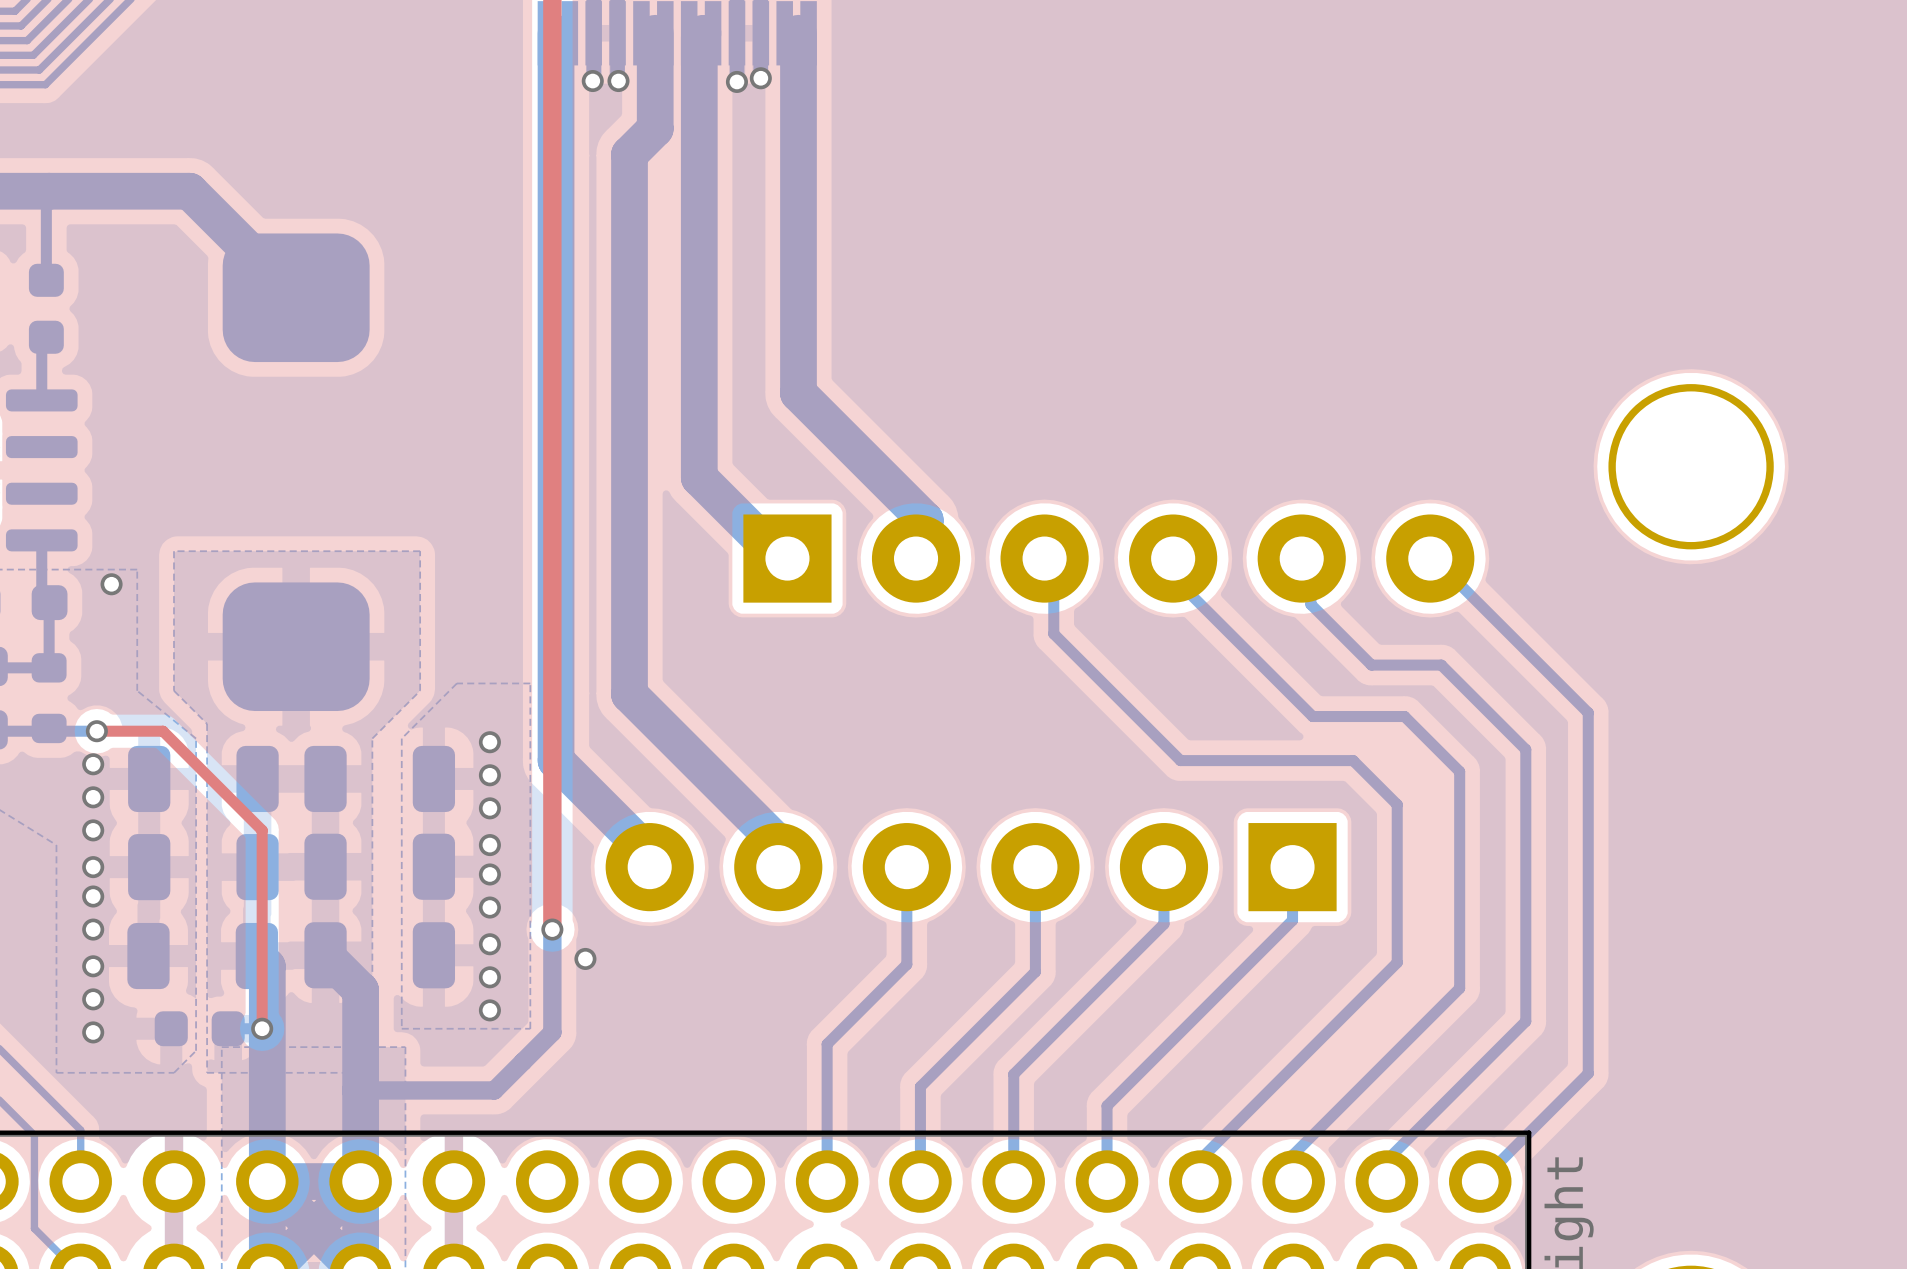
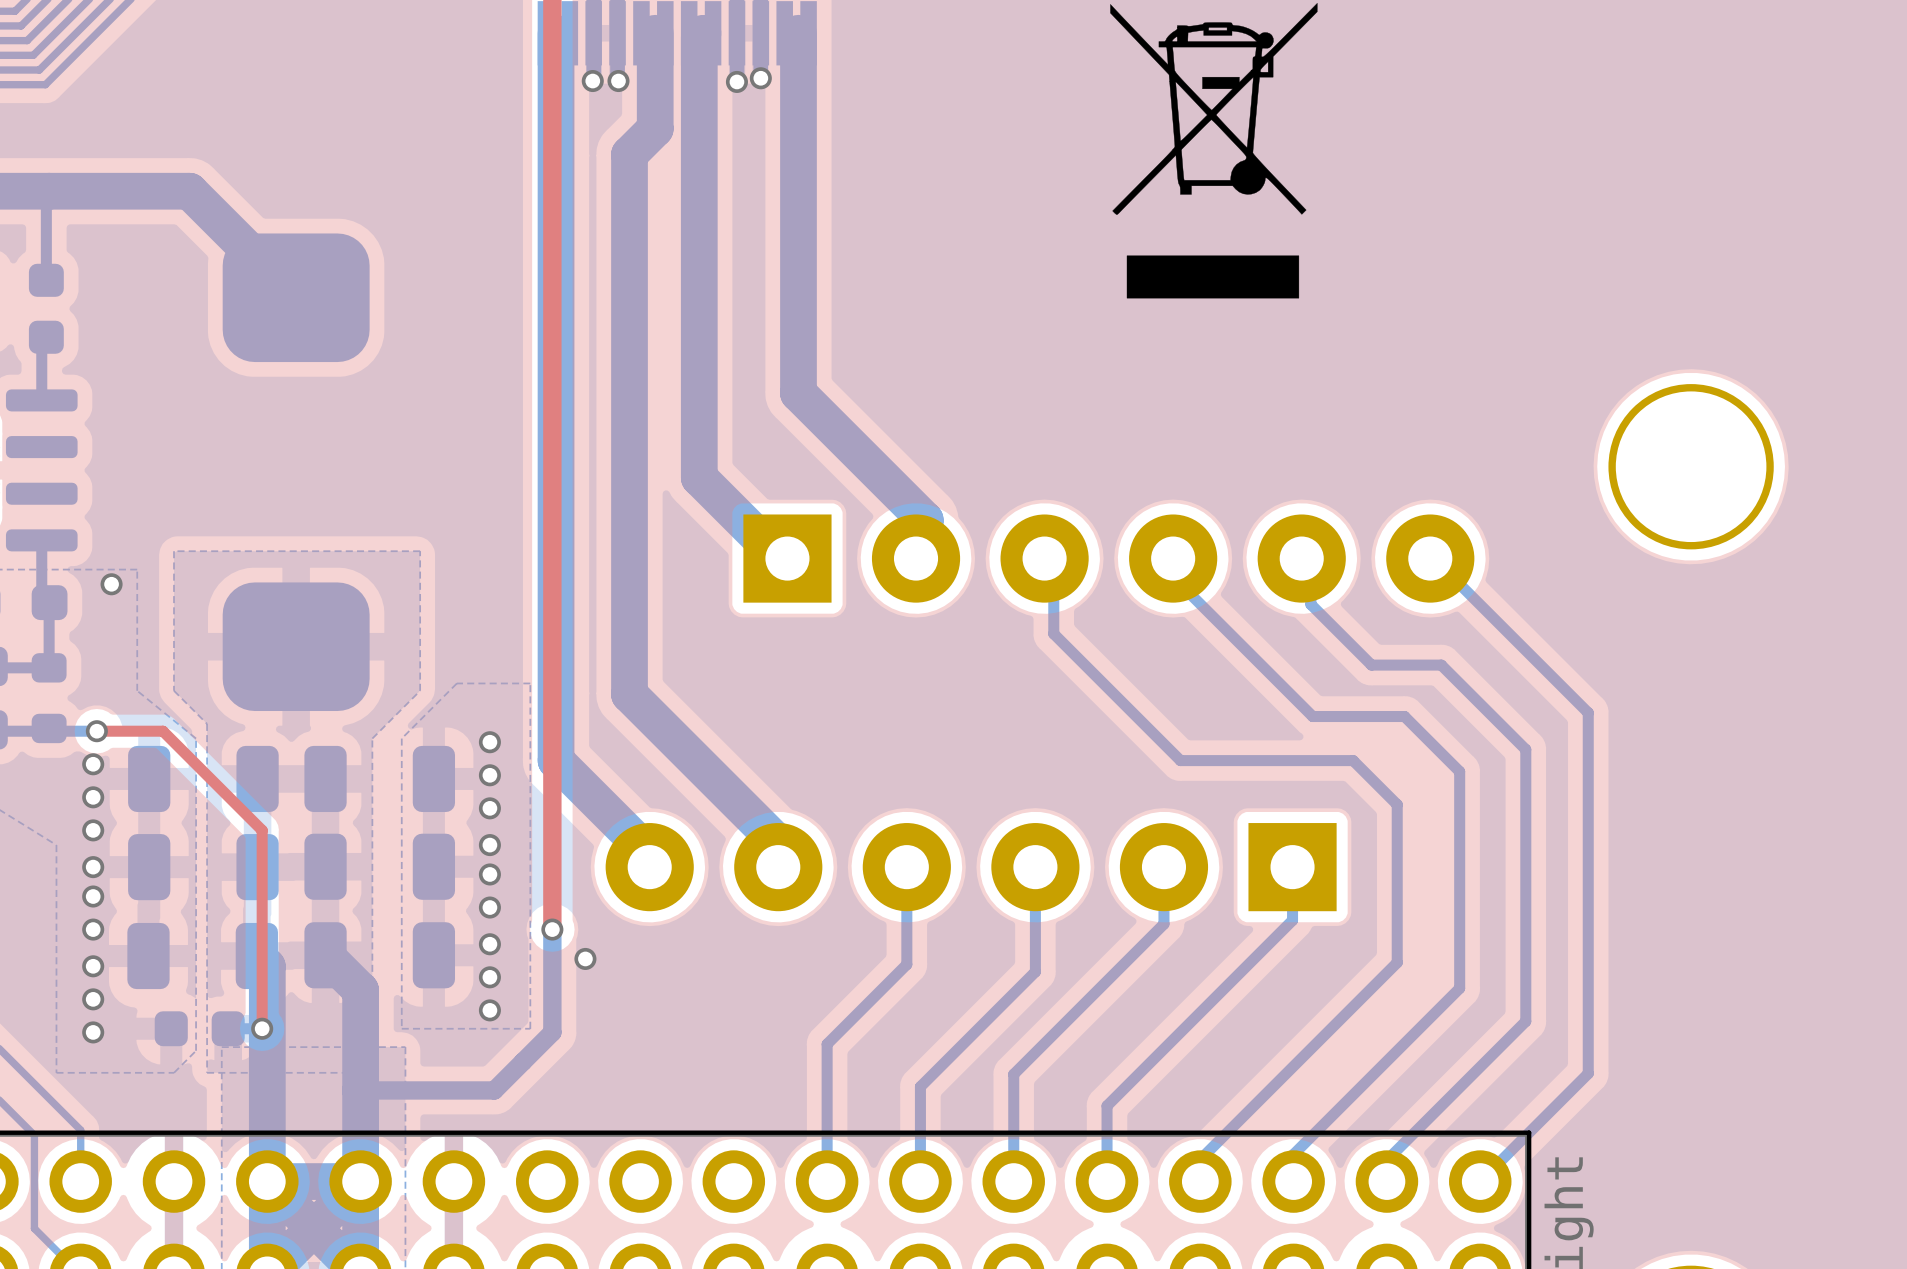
drawing: none -> [1110, 3, 1318, 299]

